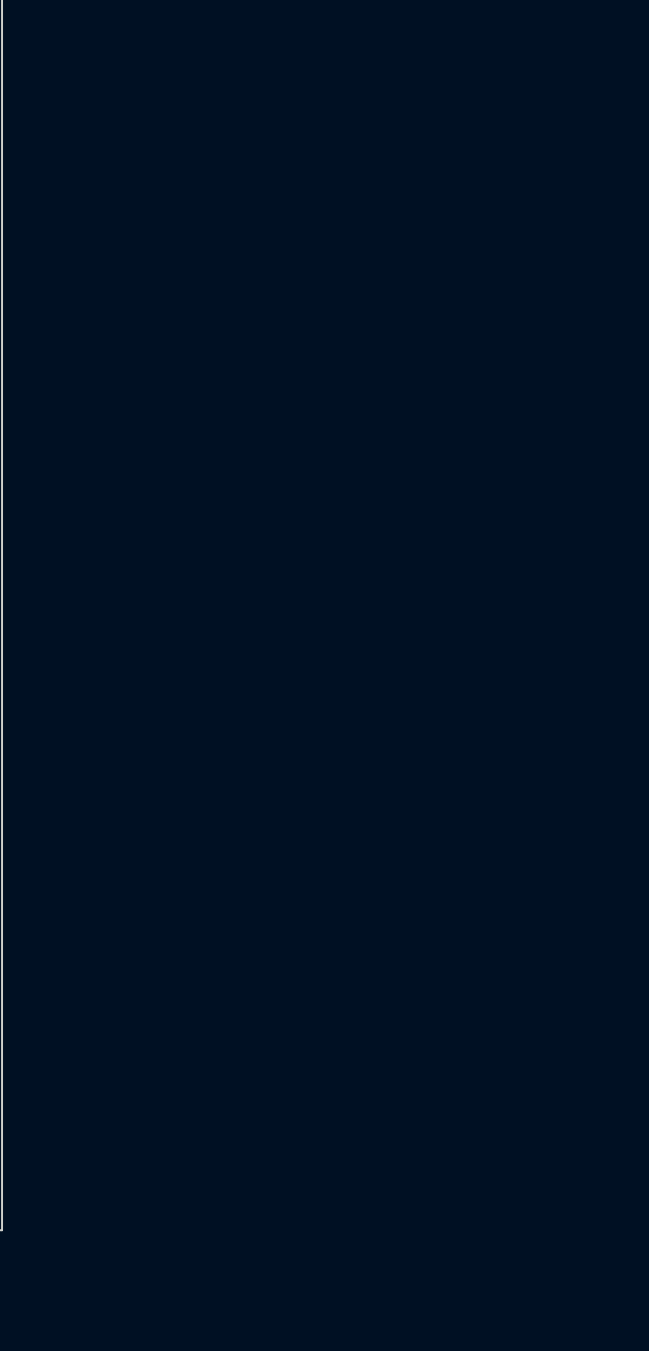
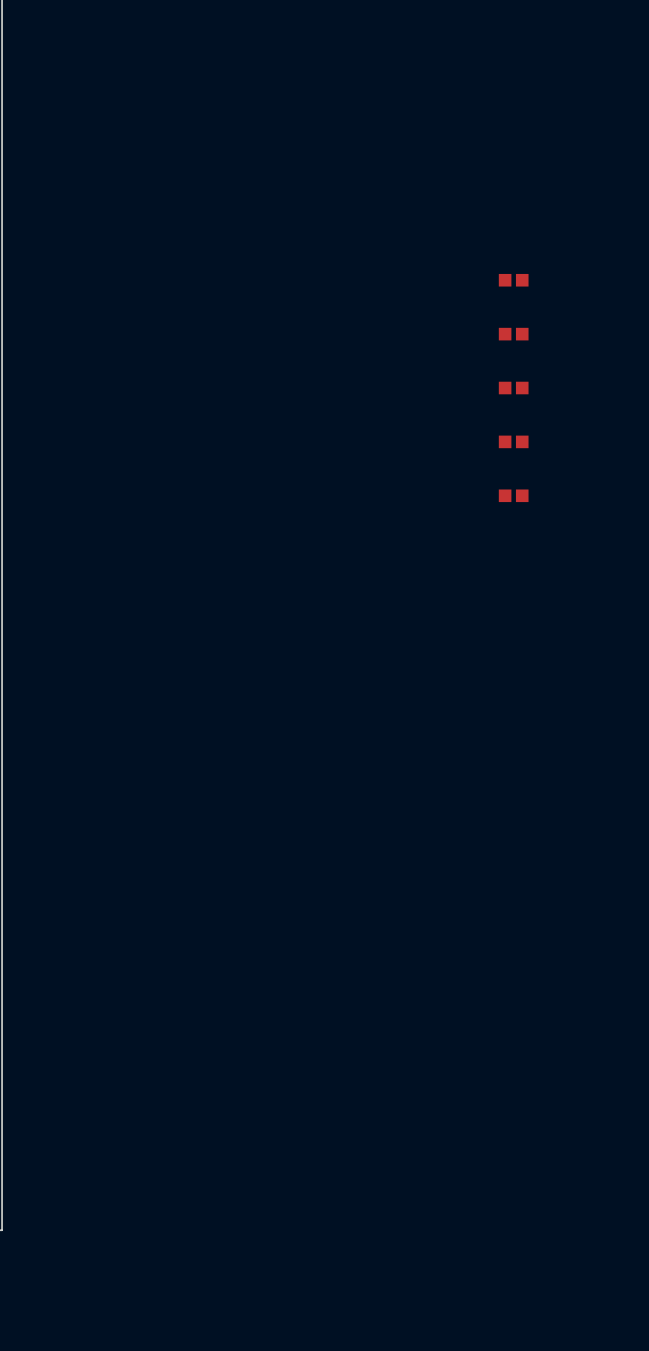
part: none -> (513, 280)
part: none -> (513, 334)
part: none -> (513, 388)
part: none -> (513, 441)
part: none -> (513, 495)

